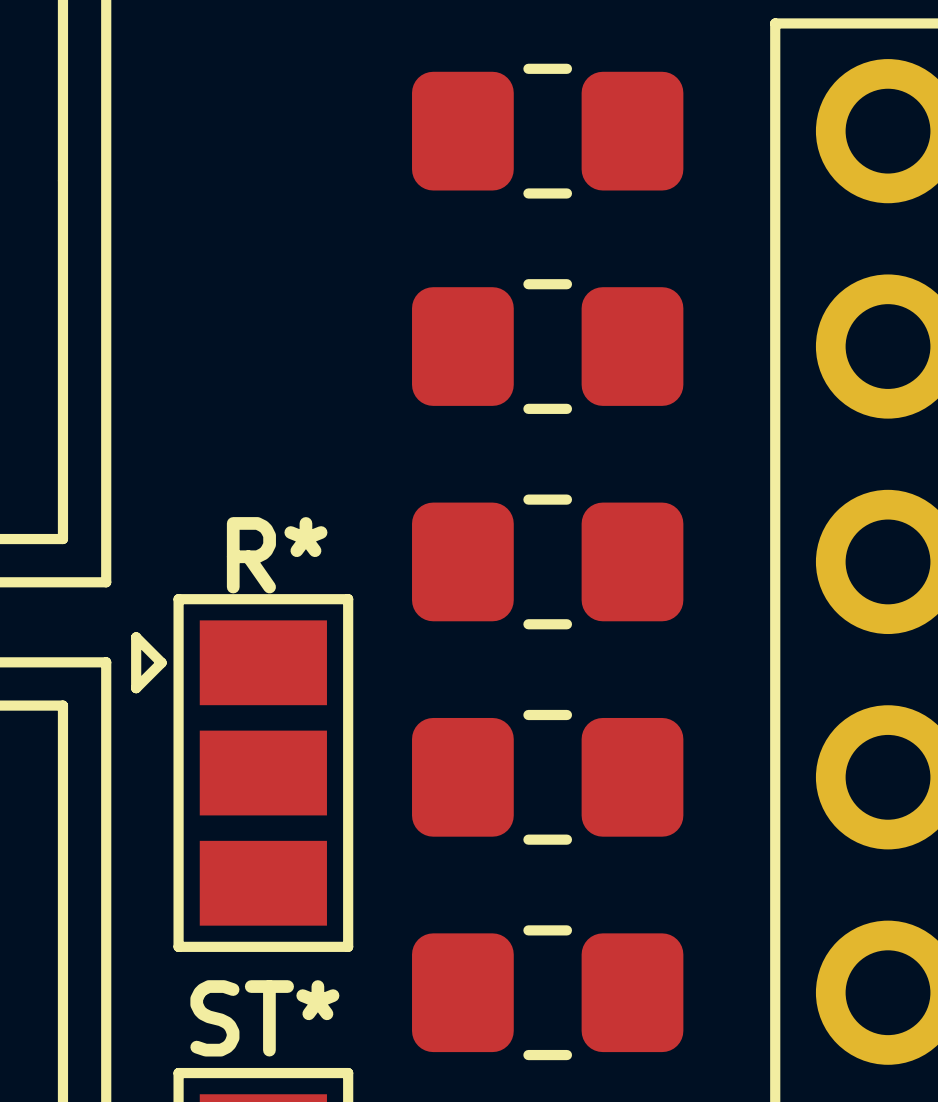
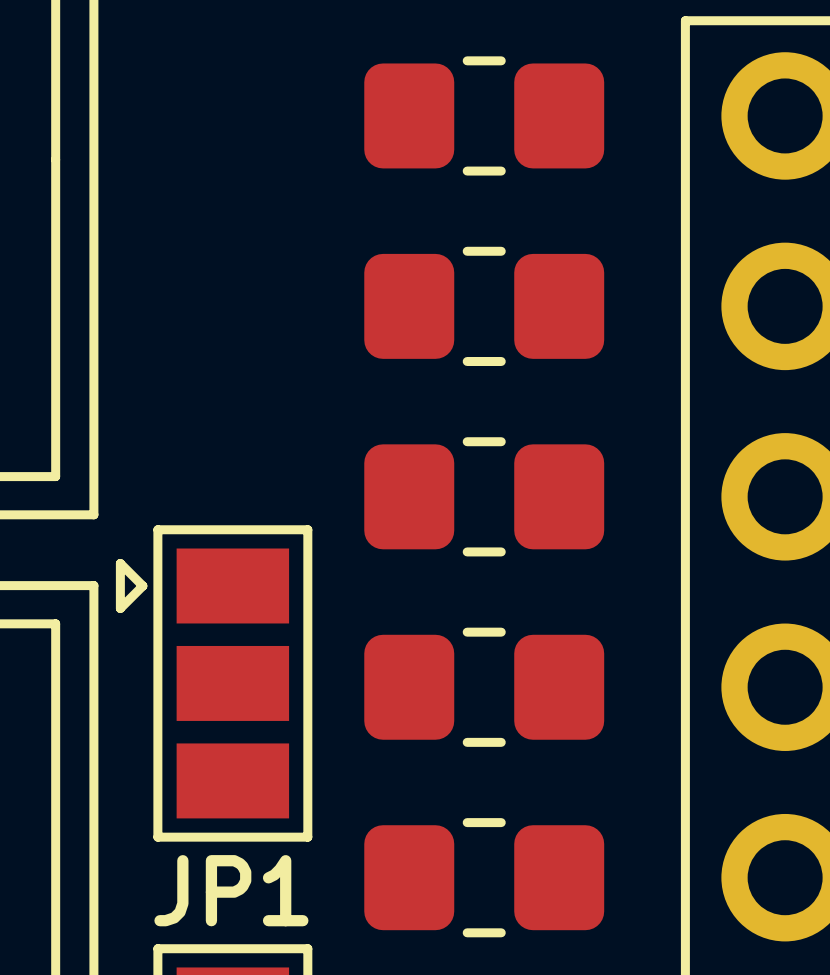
text: R* (277, 555) -> none
JP1 name: none -> JP1 (231, 890)
text: ST* (264, 1018) -> none

